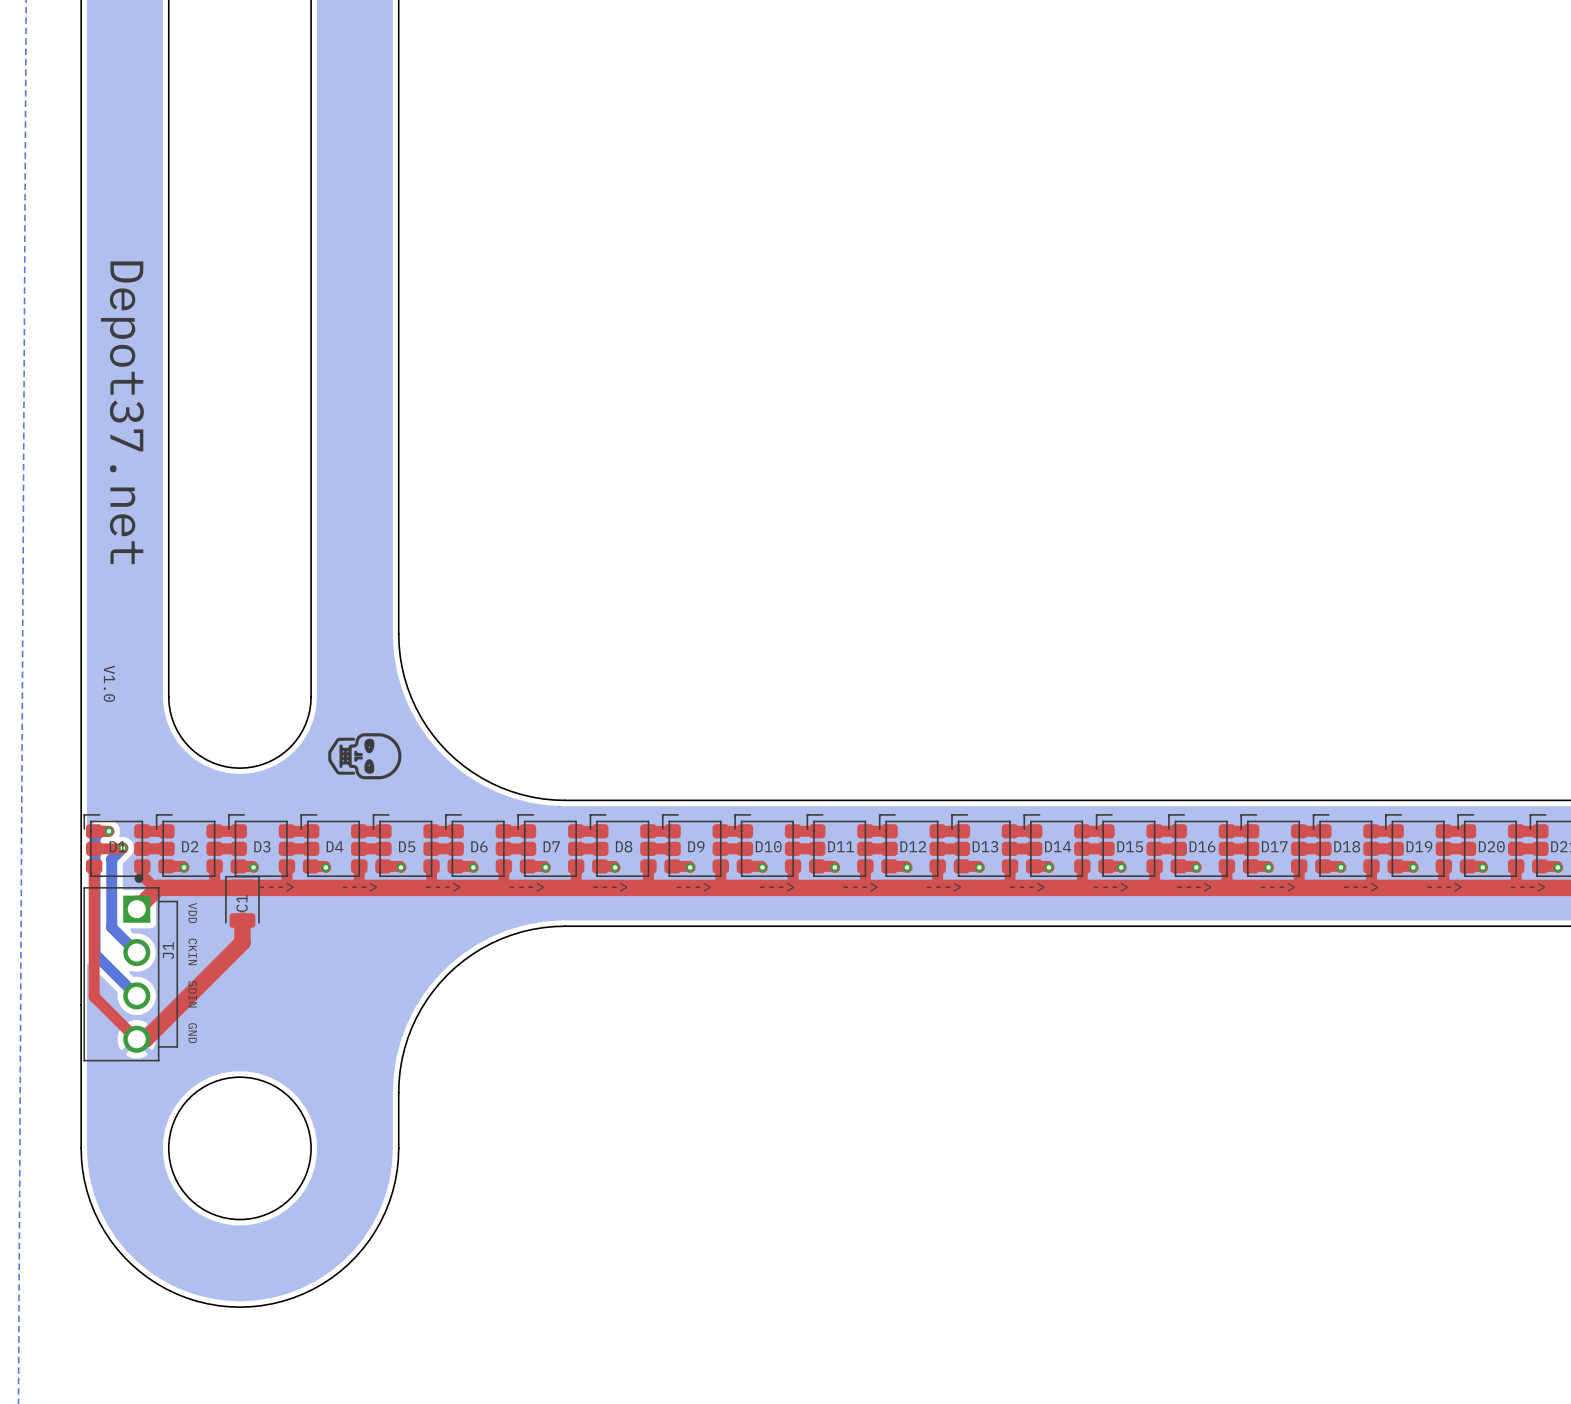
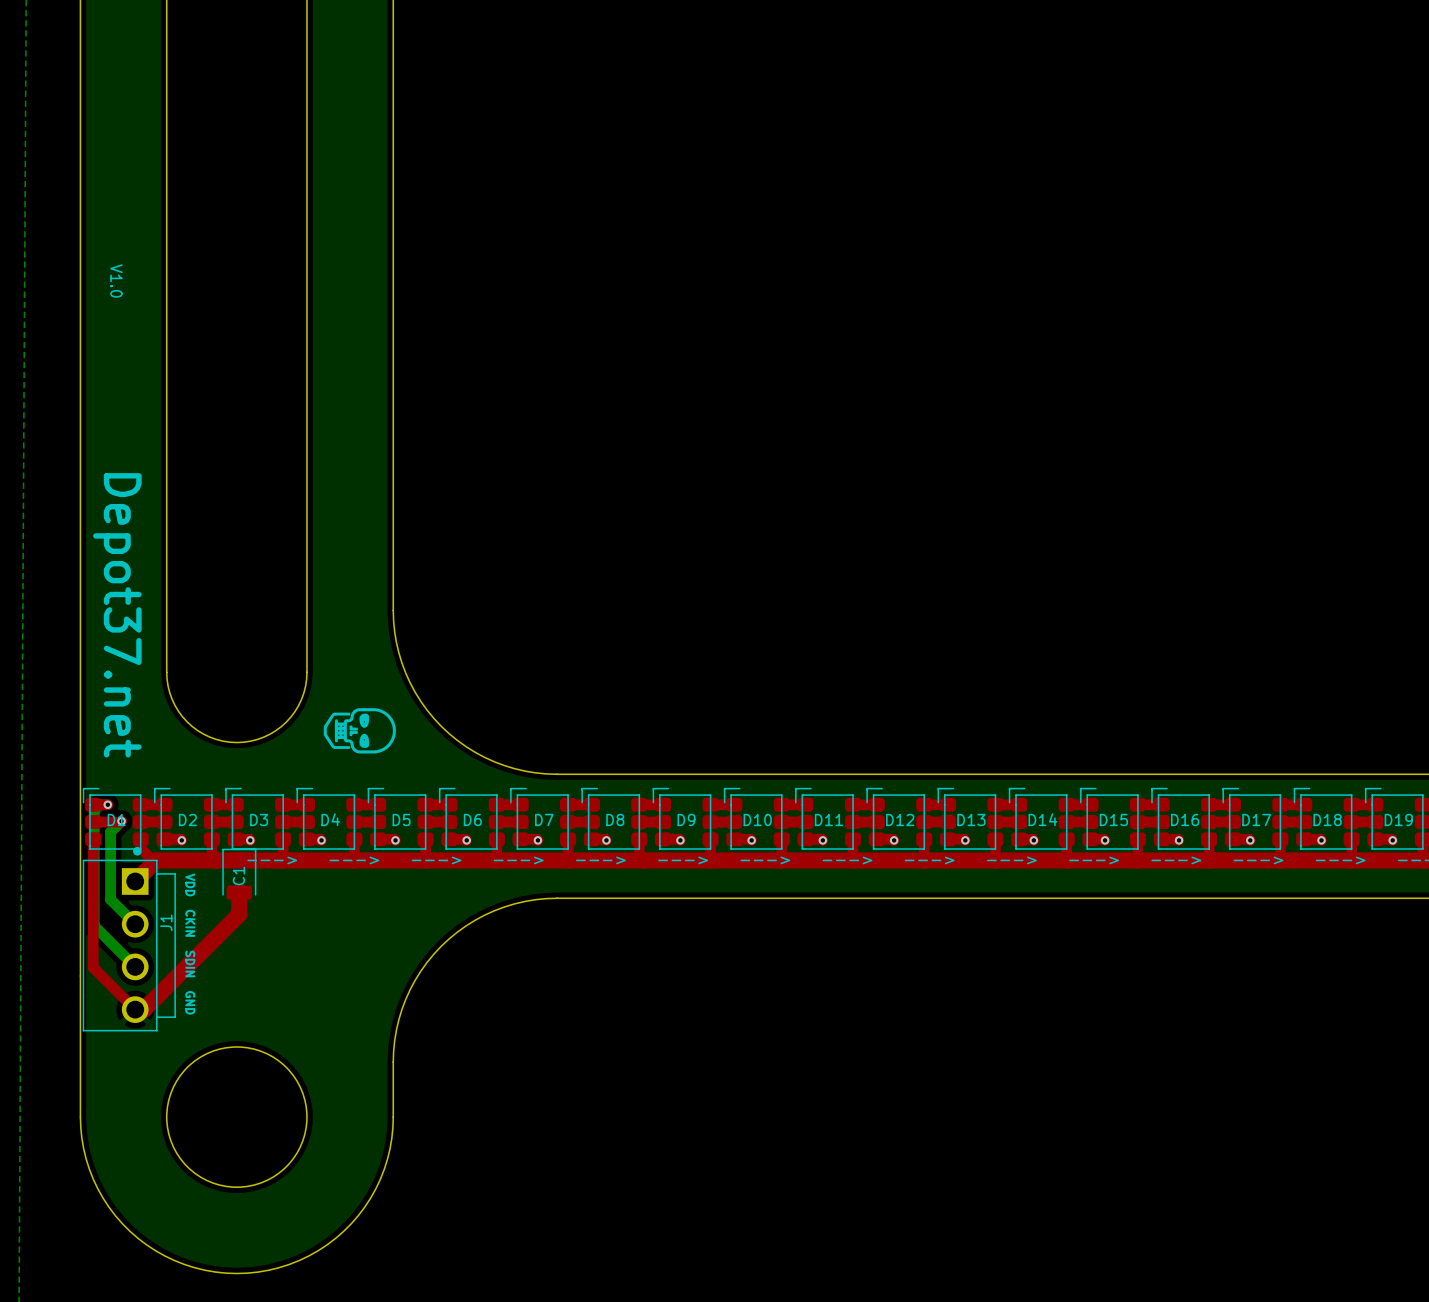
text: none -> V1.0 (116, 280)
text position: Depot37.net (122, 412) -> Depot37.net (117, 615)
text: V1.0 (109, 683) -> none

